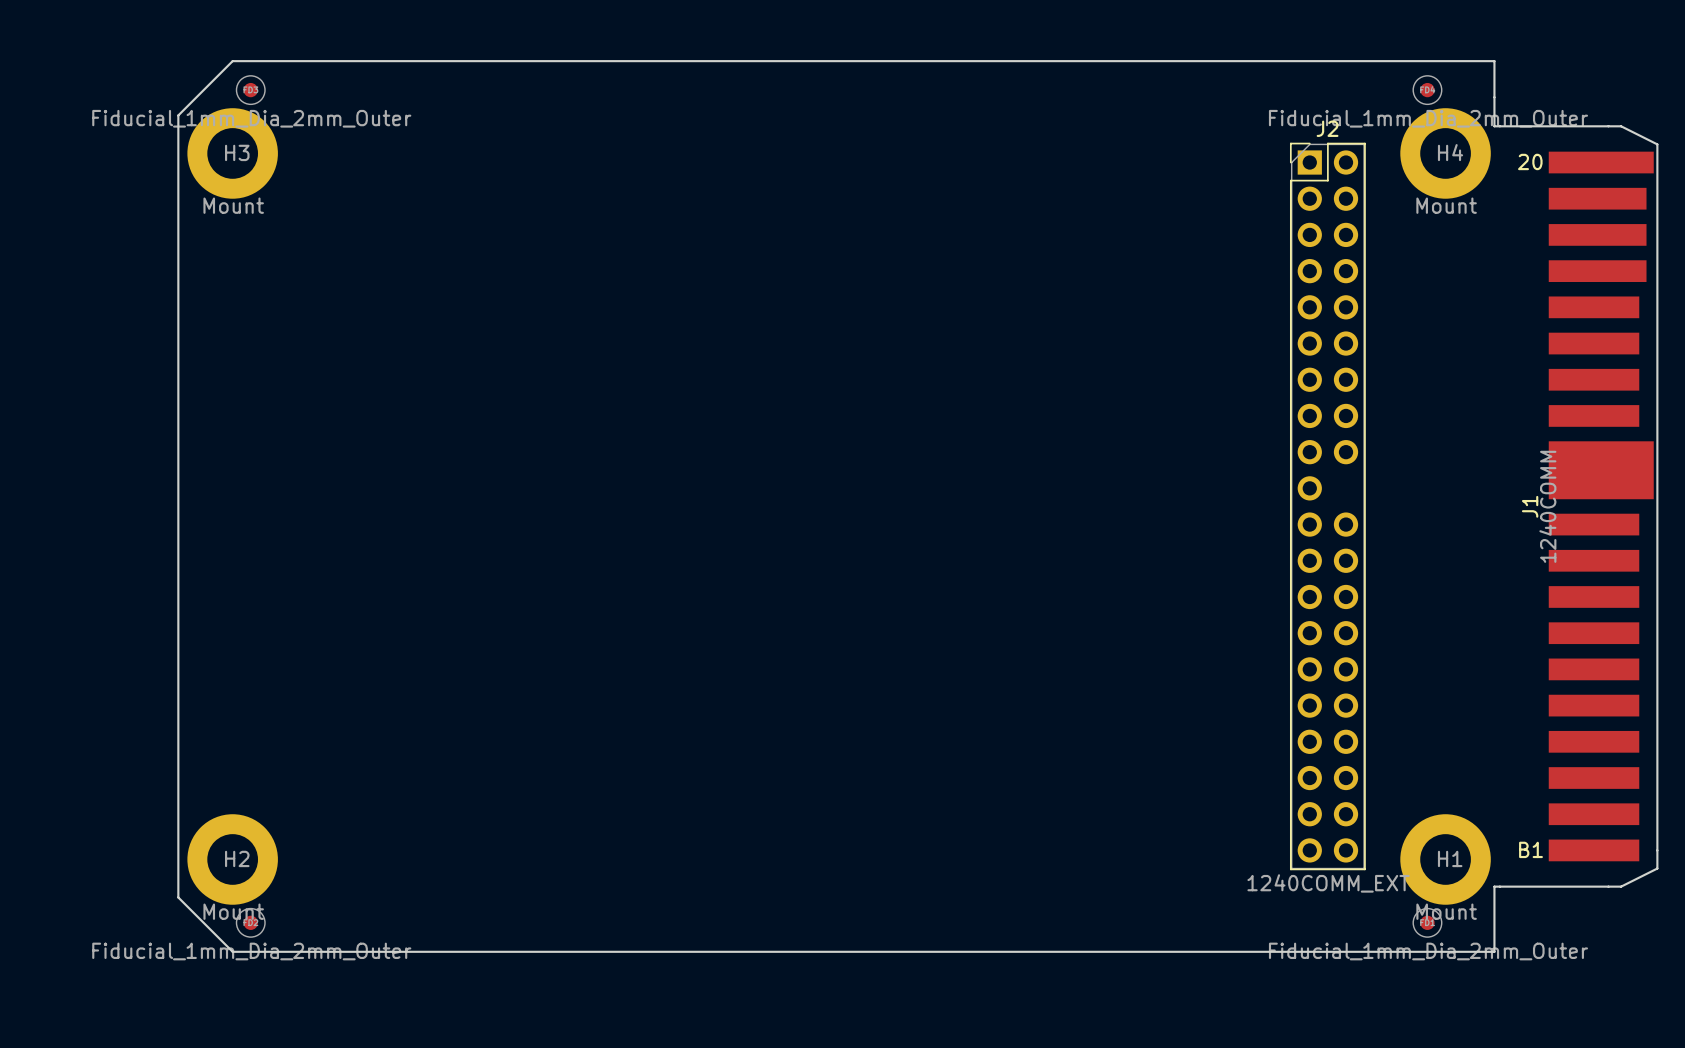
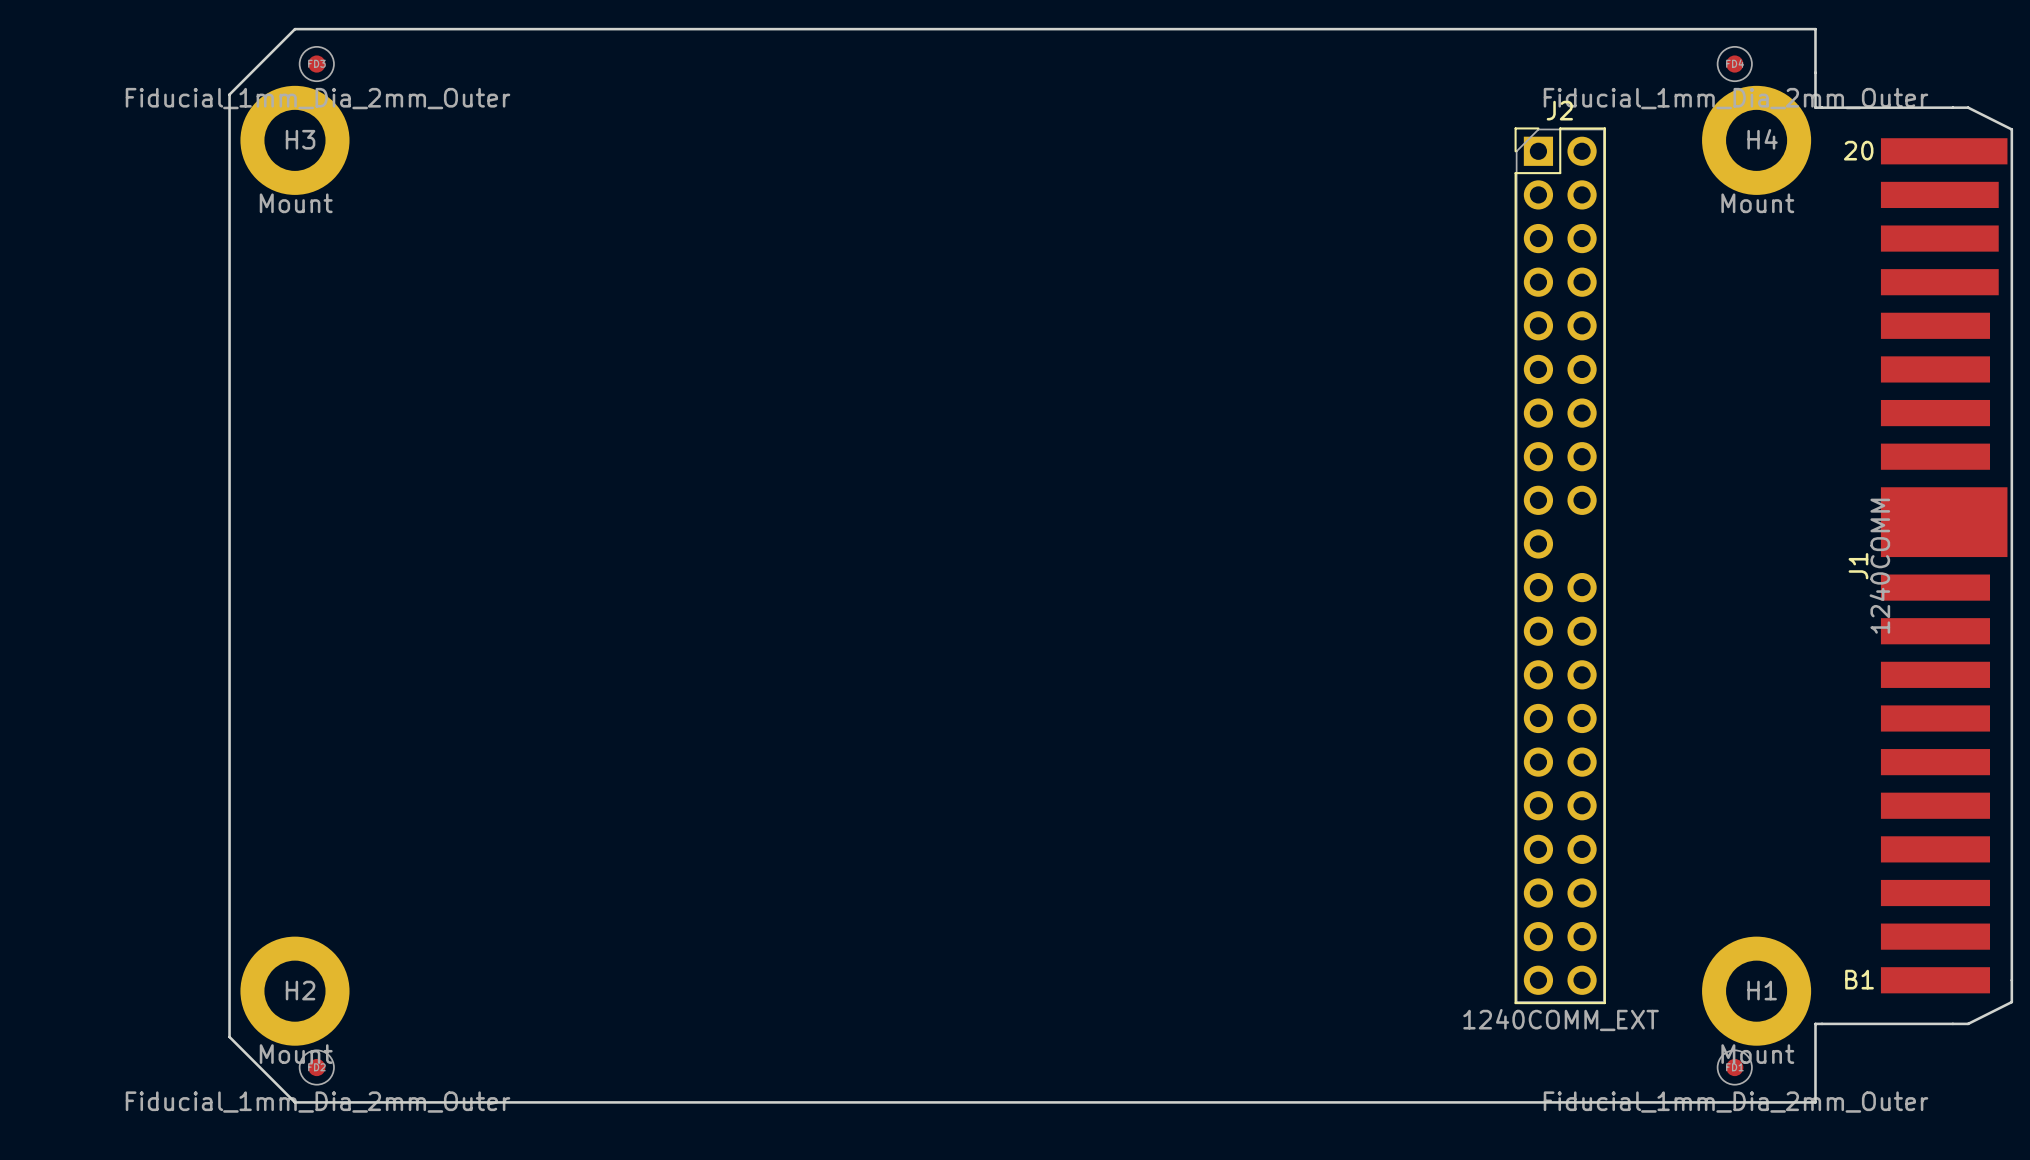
J2 position: (1327, 506) -> (1560, 565)

